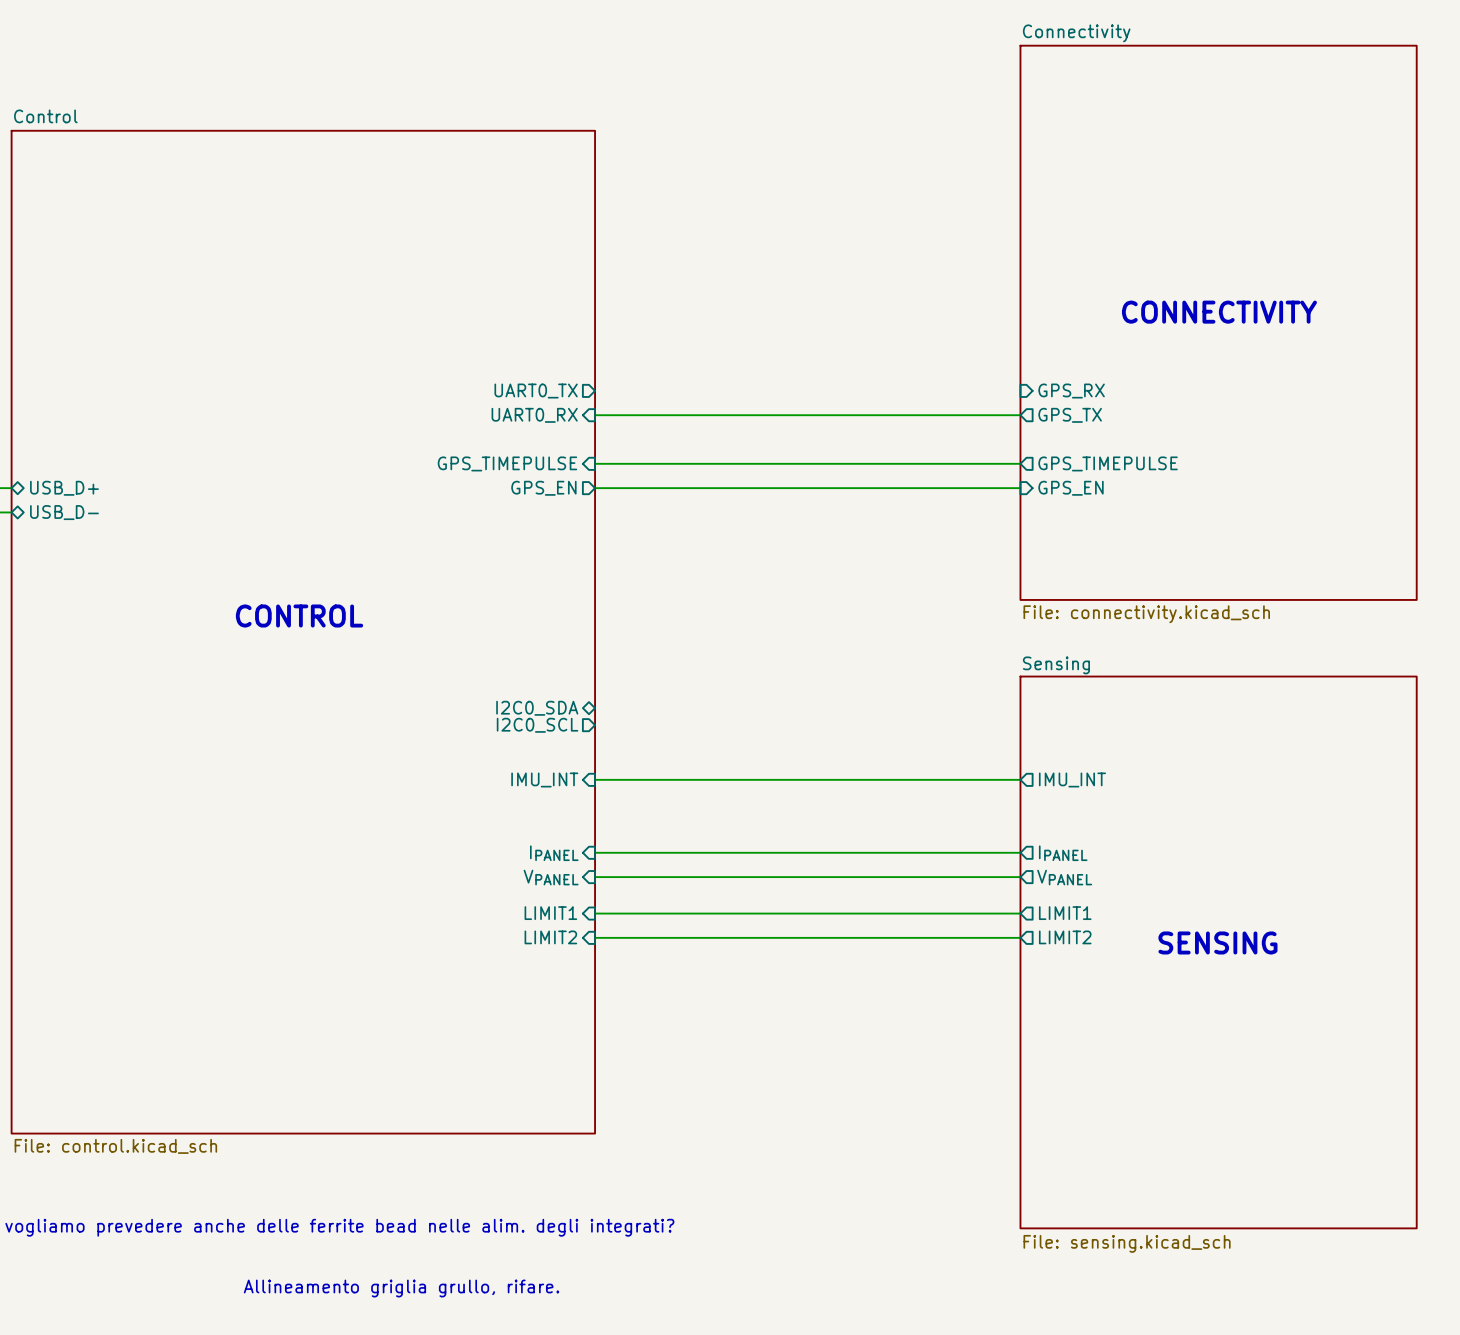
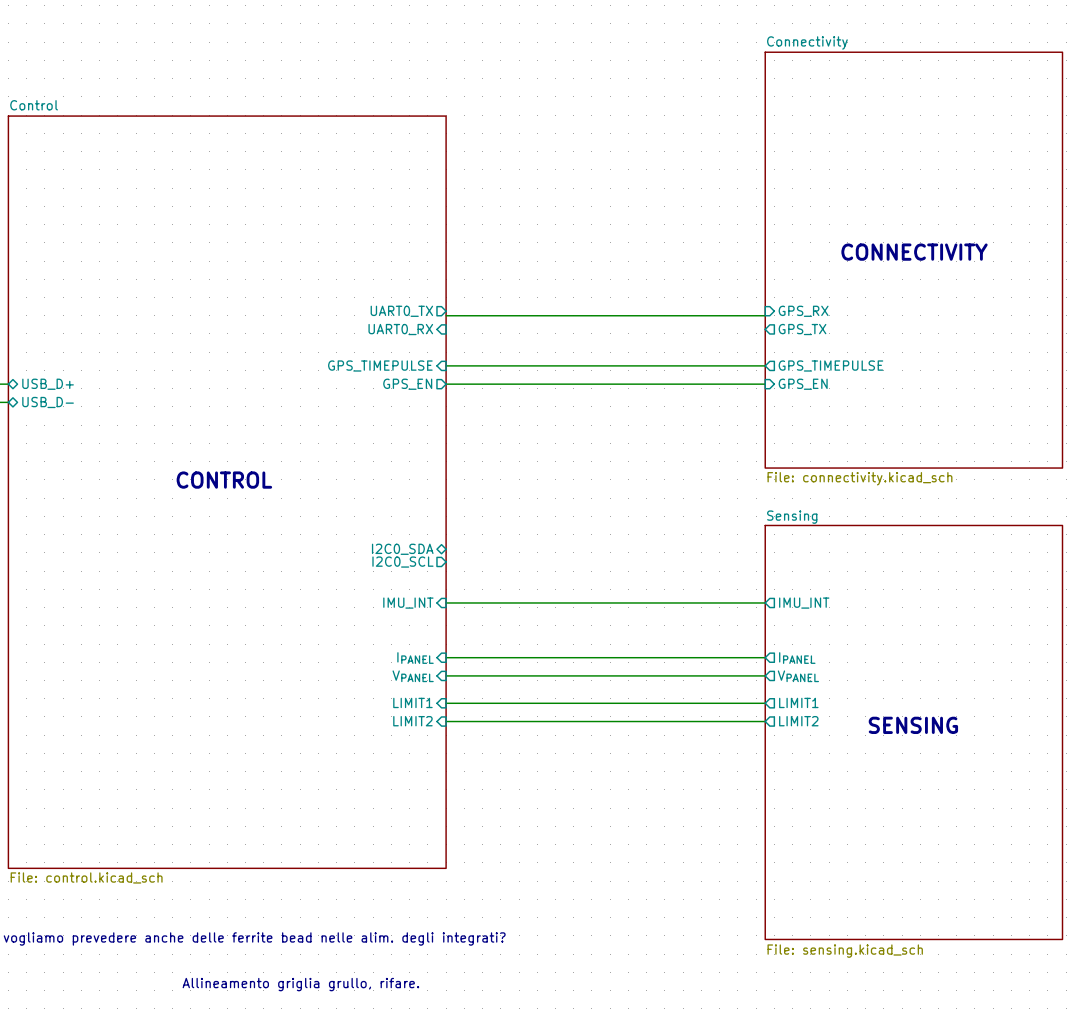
wire: (595, 415) (1020, 415) -> (446, 315) (765, 315)

